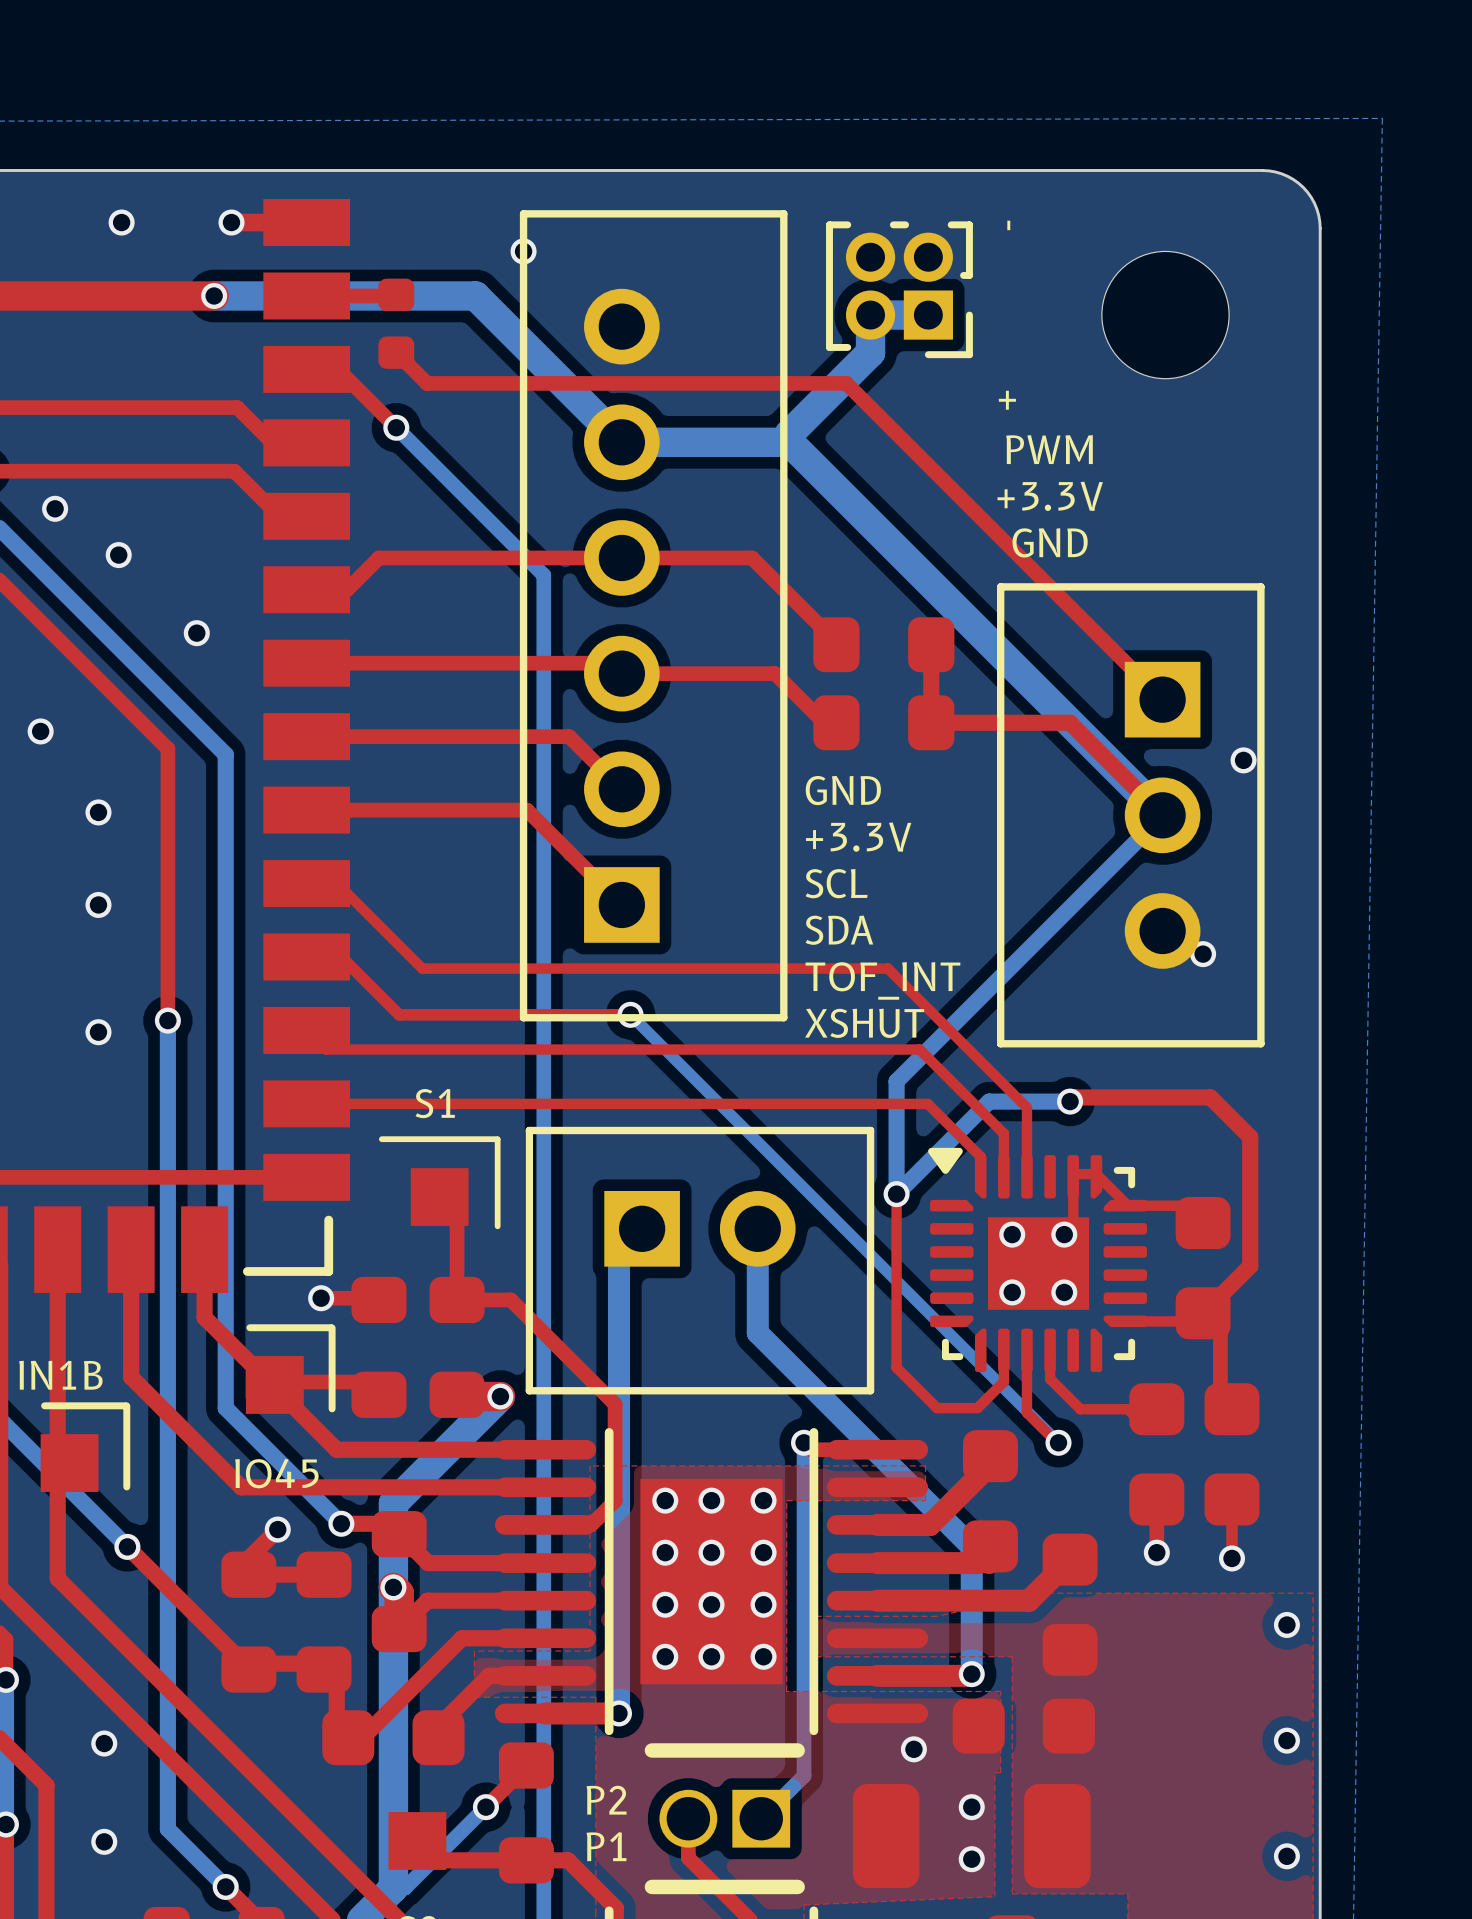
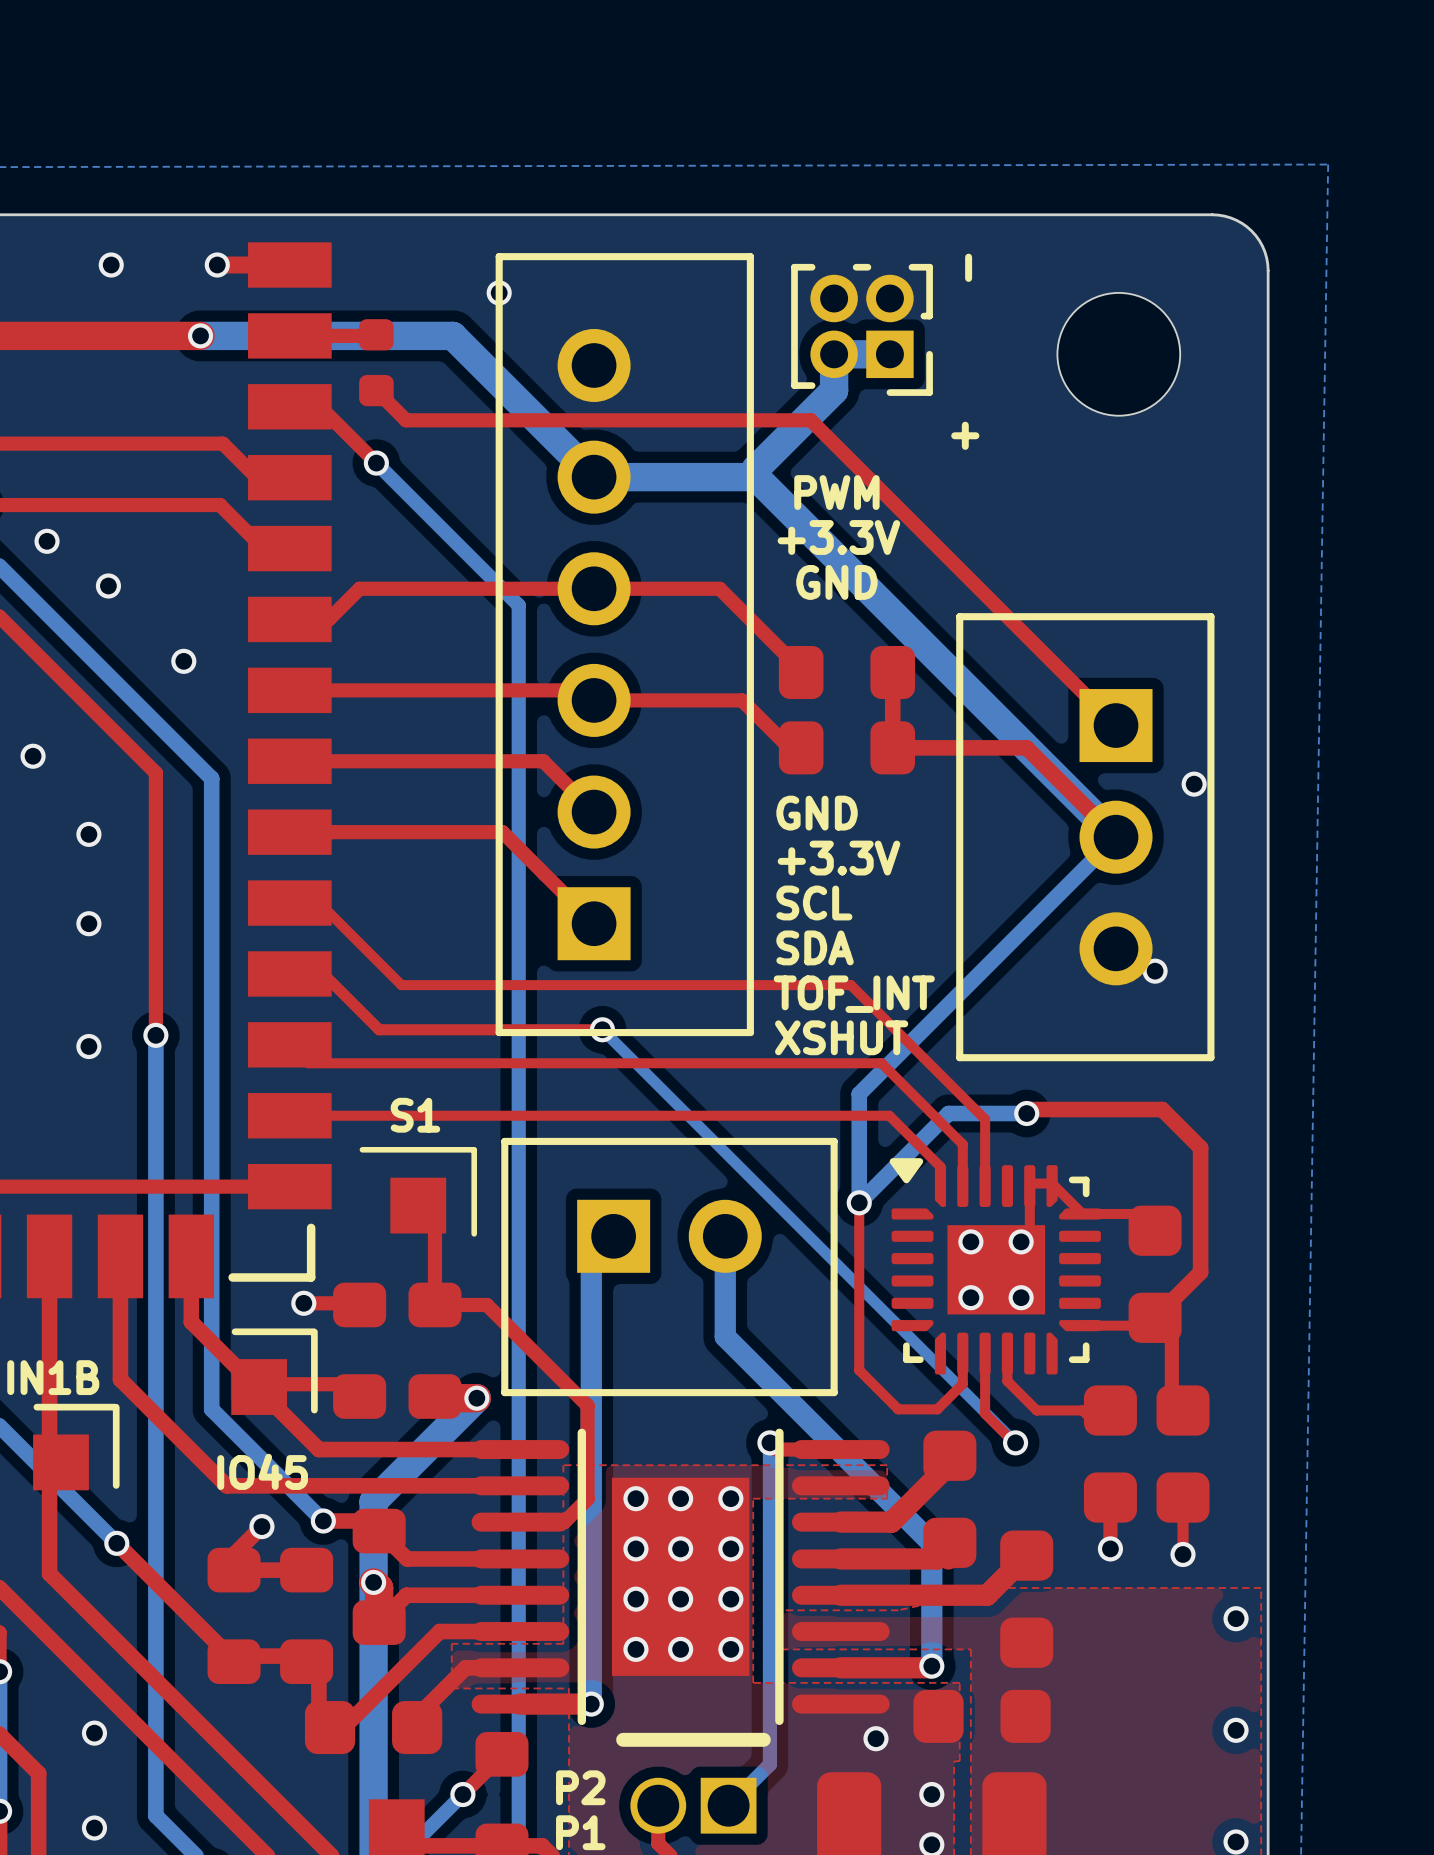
text position: PWM (1049, 449) -> PWM (836, 492)
text position: +3.3V (1050, 496) -> +3.3V (838, 537)
text position: GND (1050, 542) -> GND (836, 582)

